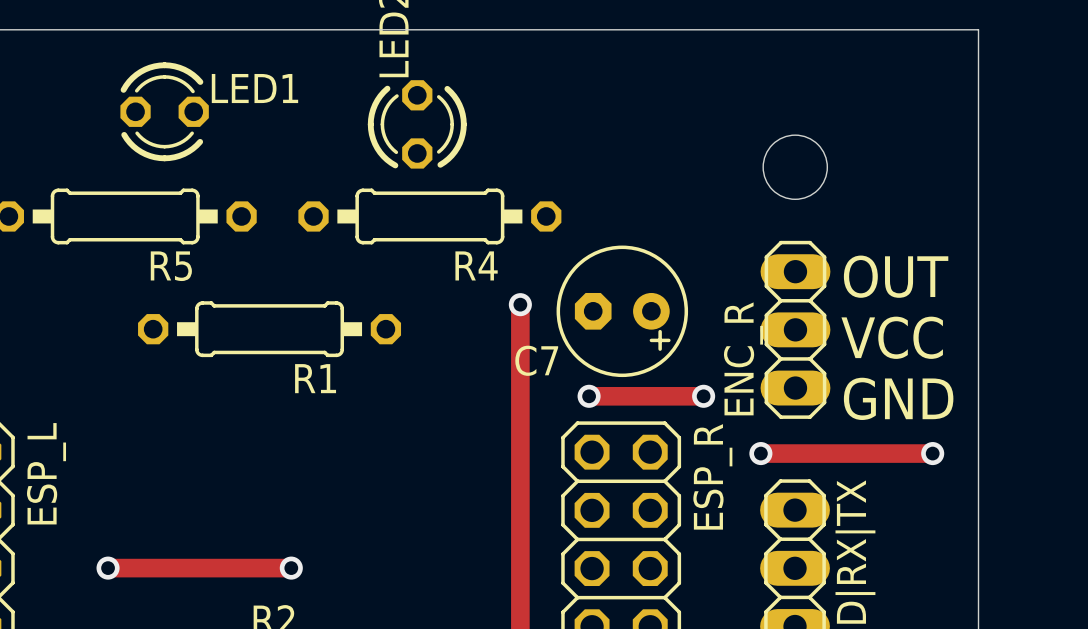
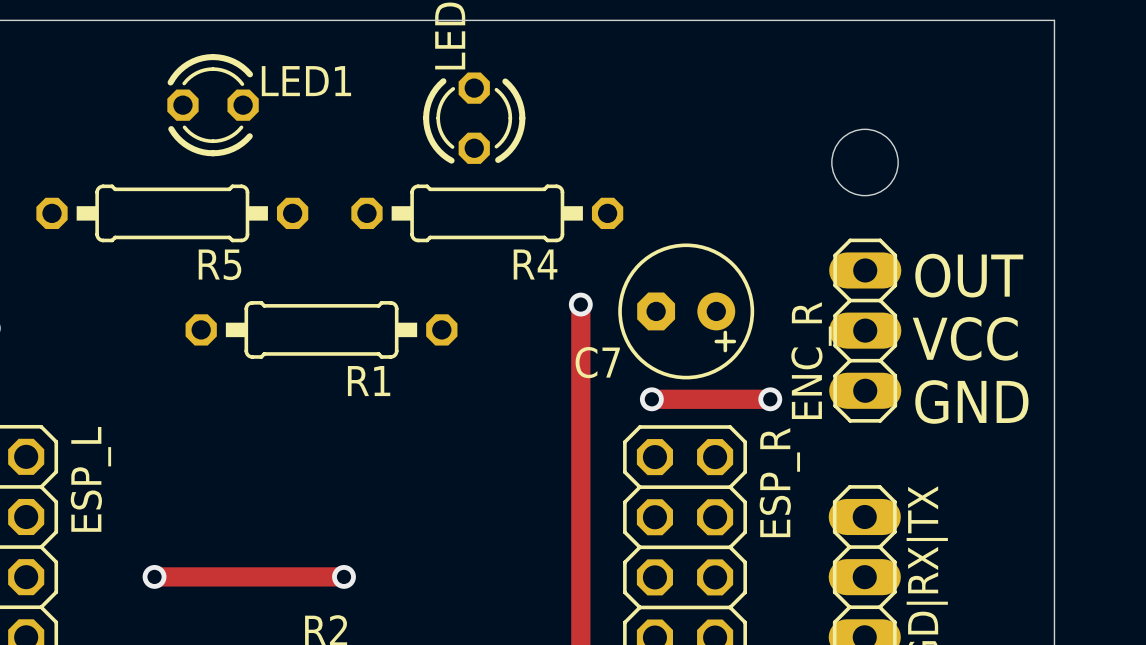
track: (760, 453) (932, 453) -> none
via: (760, 453) -> none
via: (932, 453) -> none

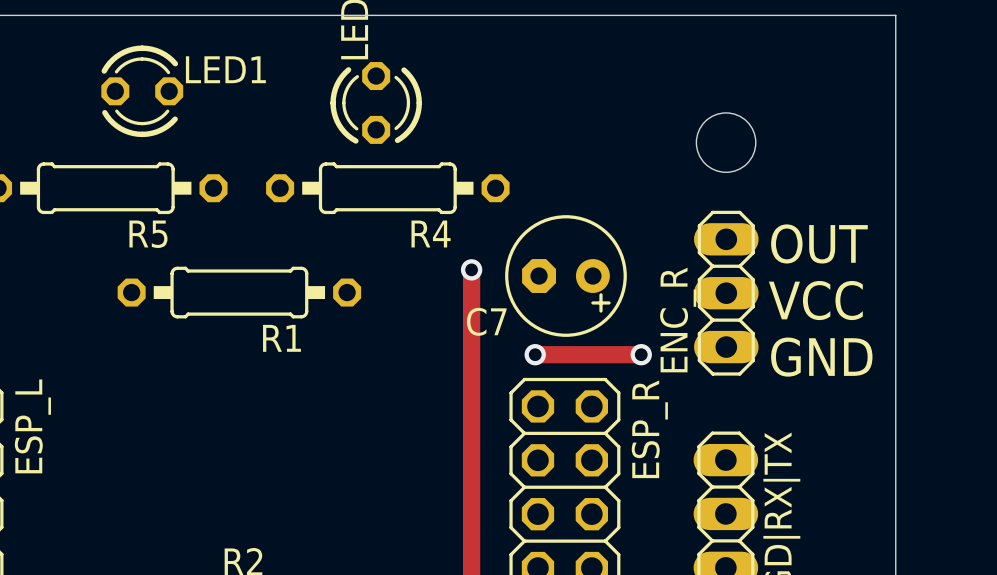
track: (154, 576) (344, 576) -> none
via: (154, 576) -> none
via: (344, 576) -> none

